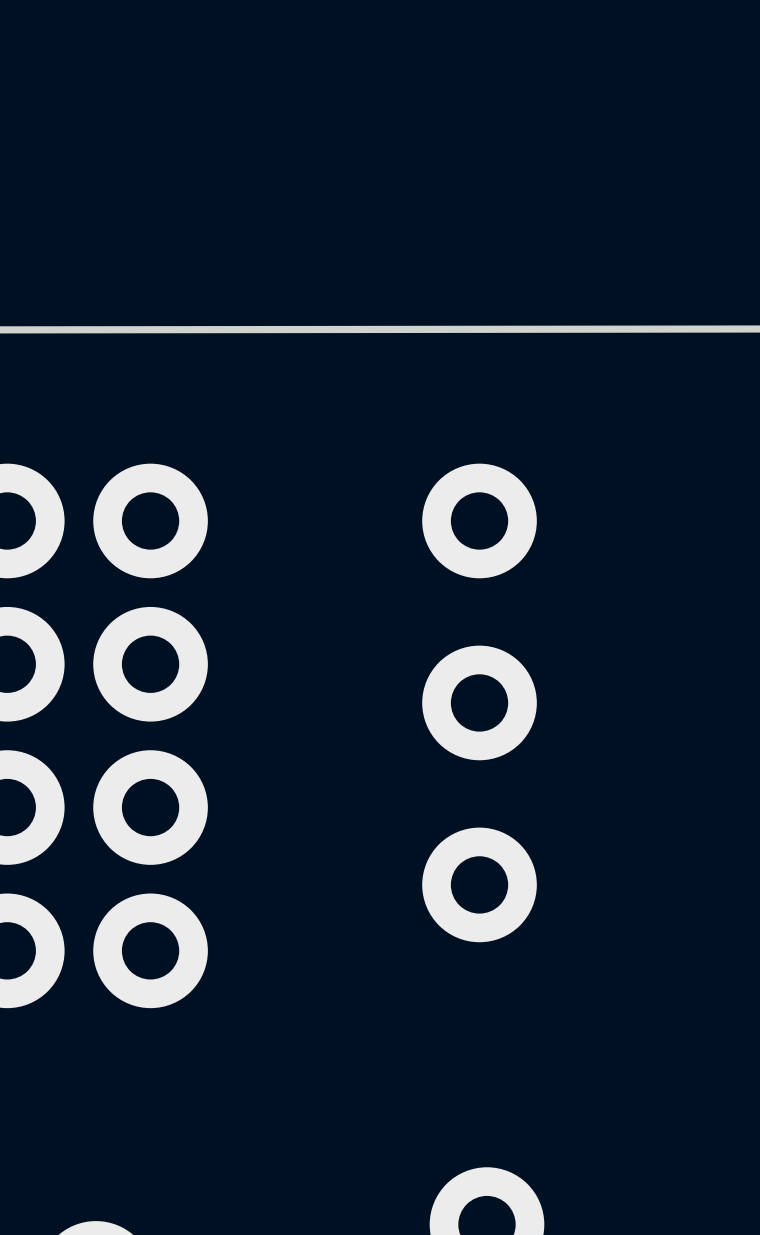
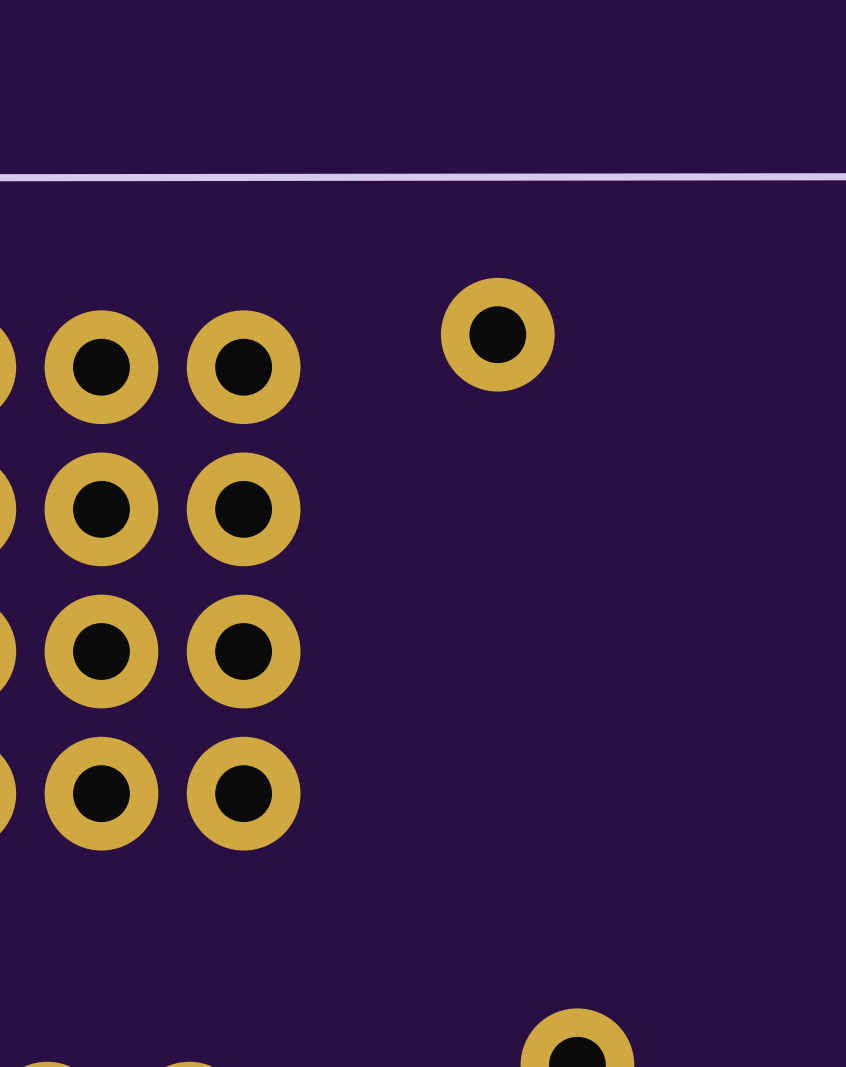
via position: (479, 520) -> (497, 334)
via: (479, 702) -> none
via: (479, 884) -> none

